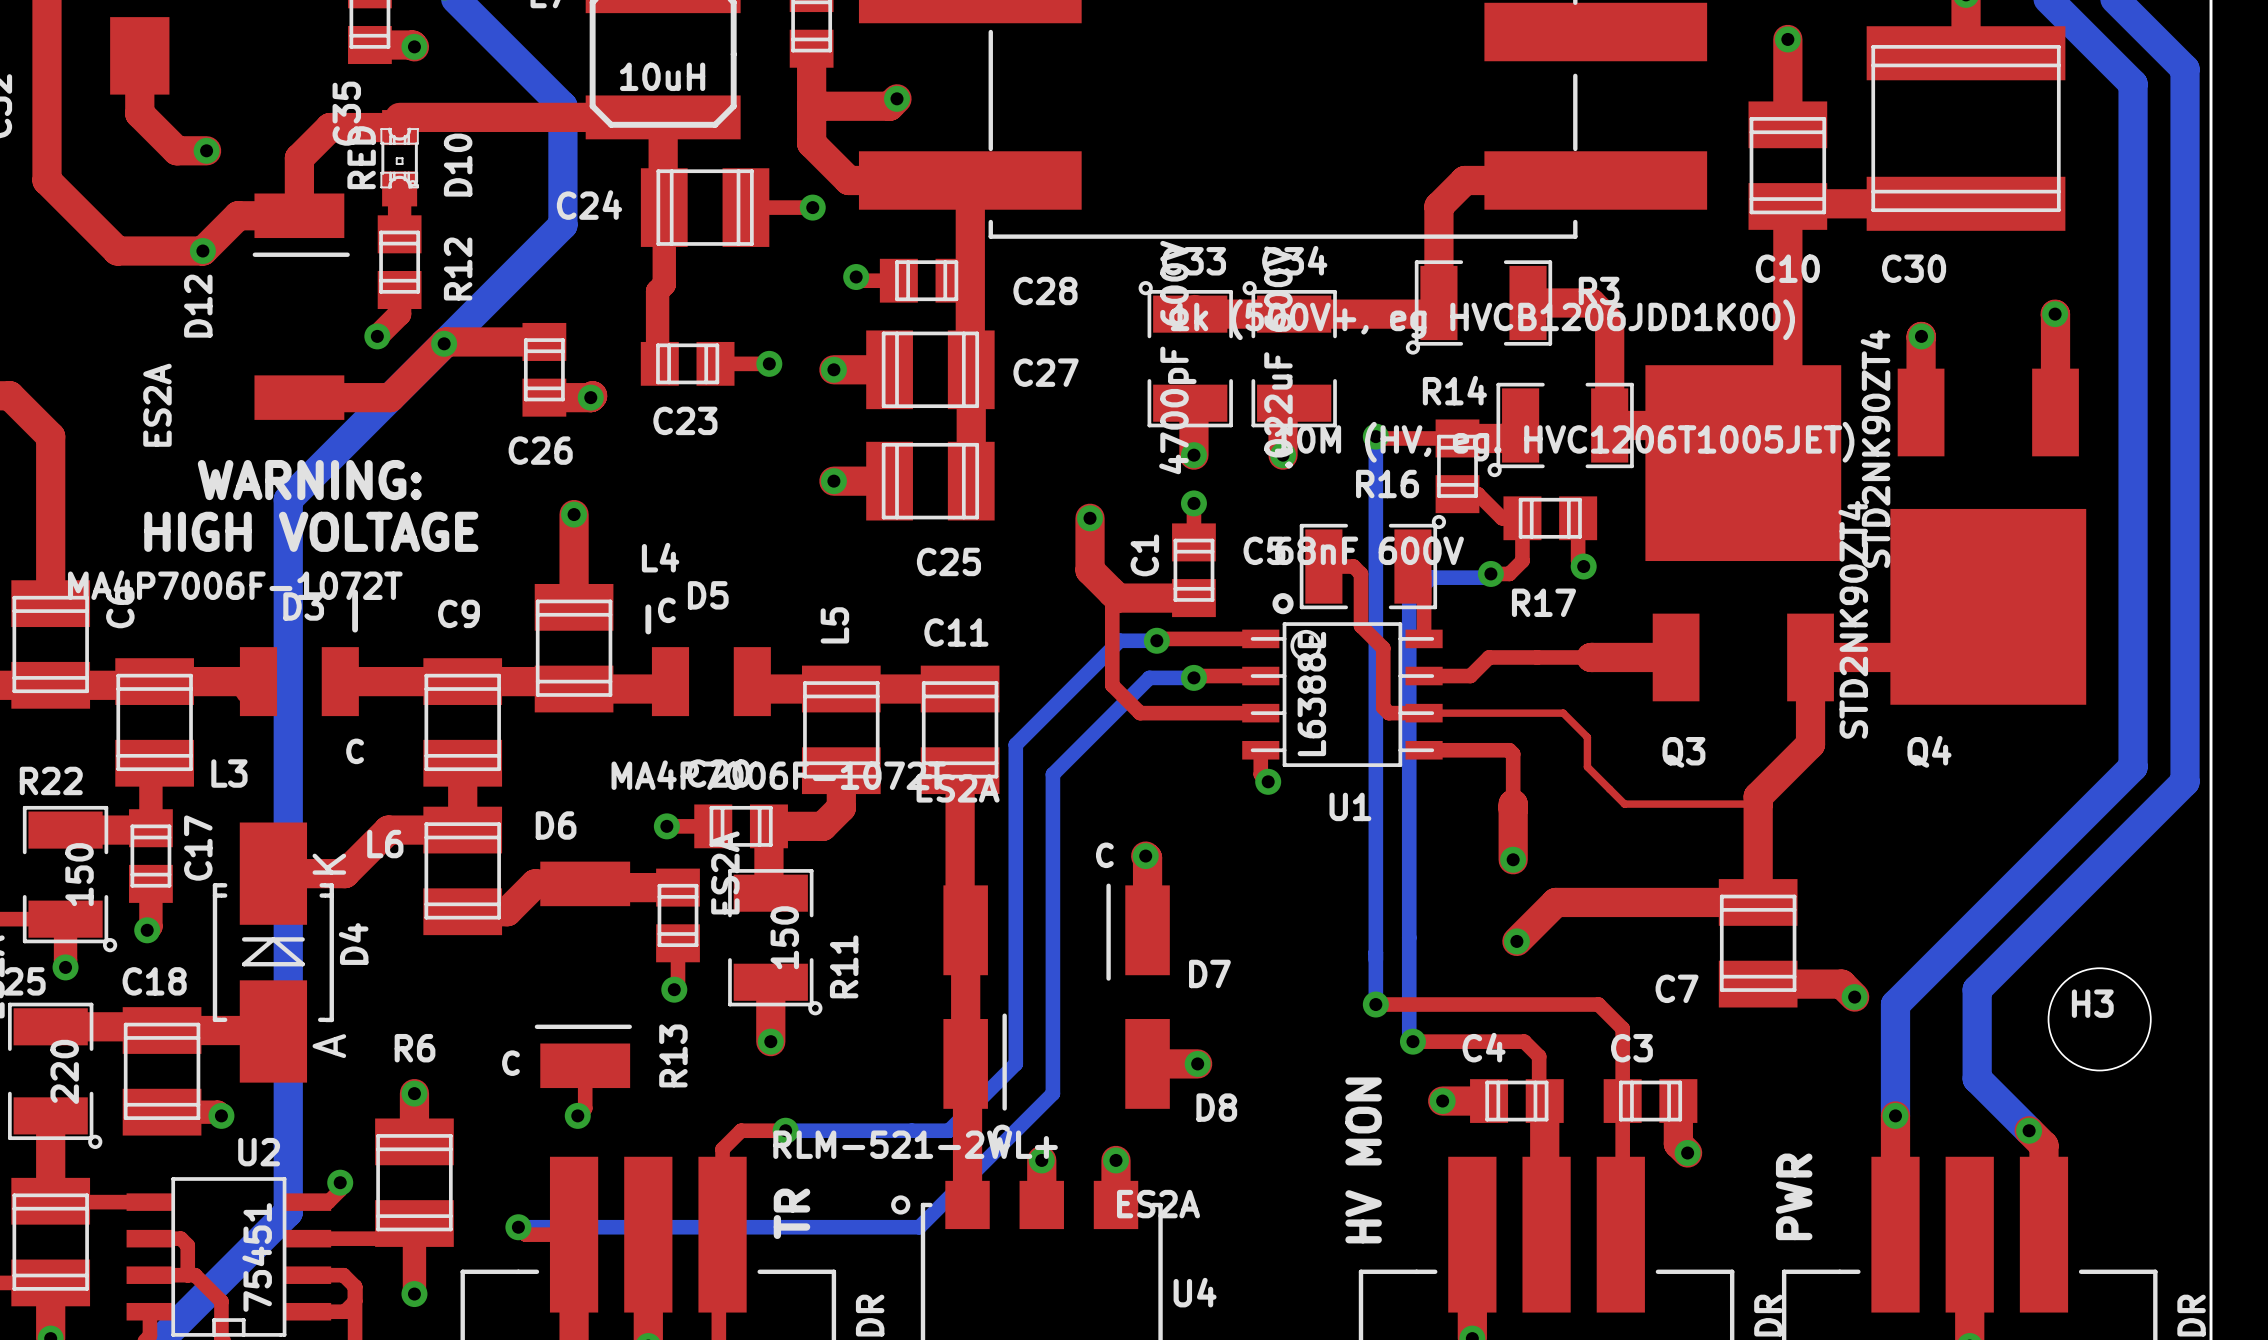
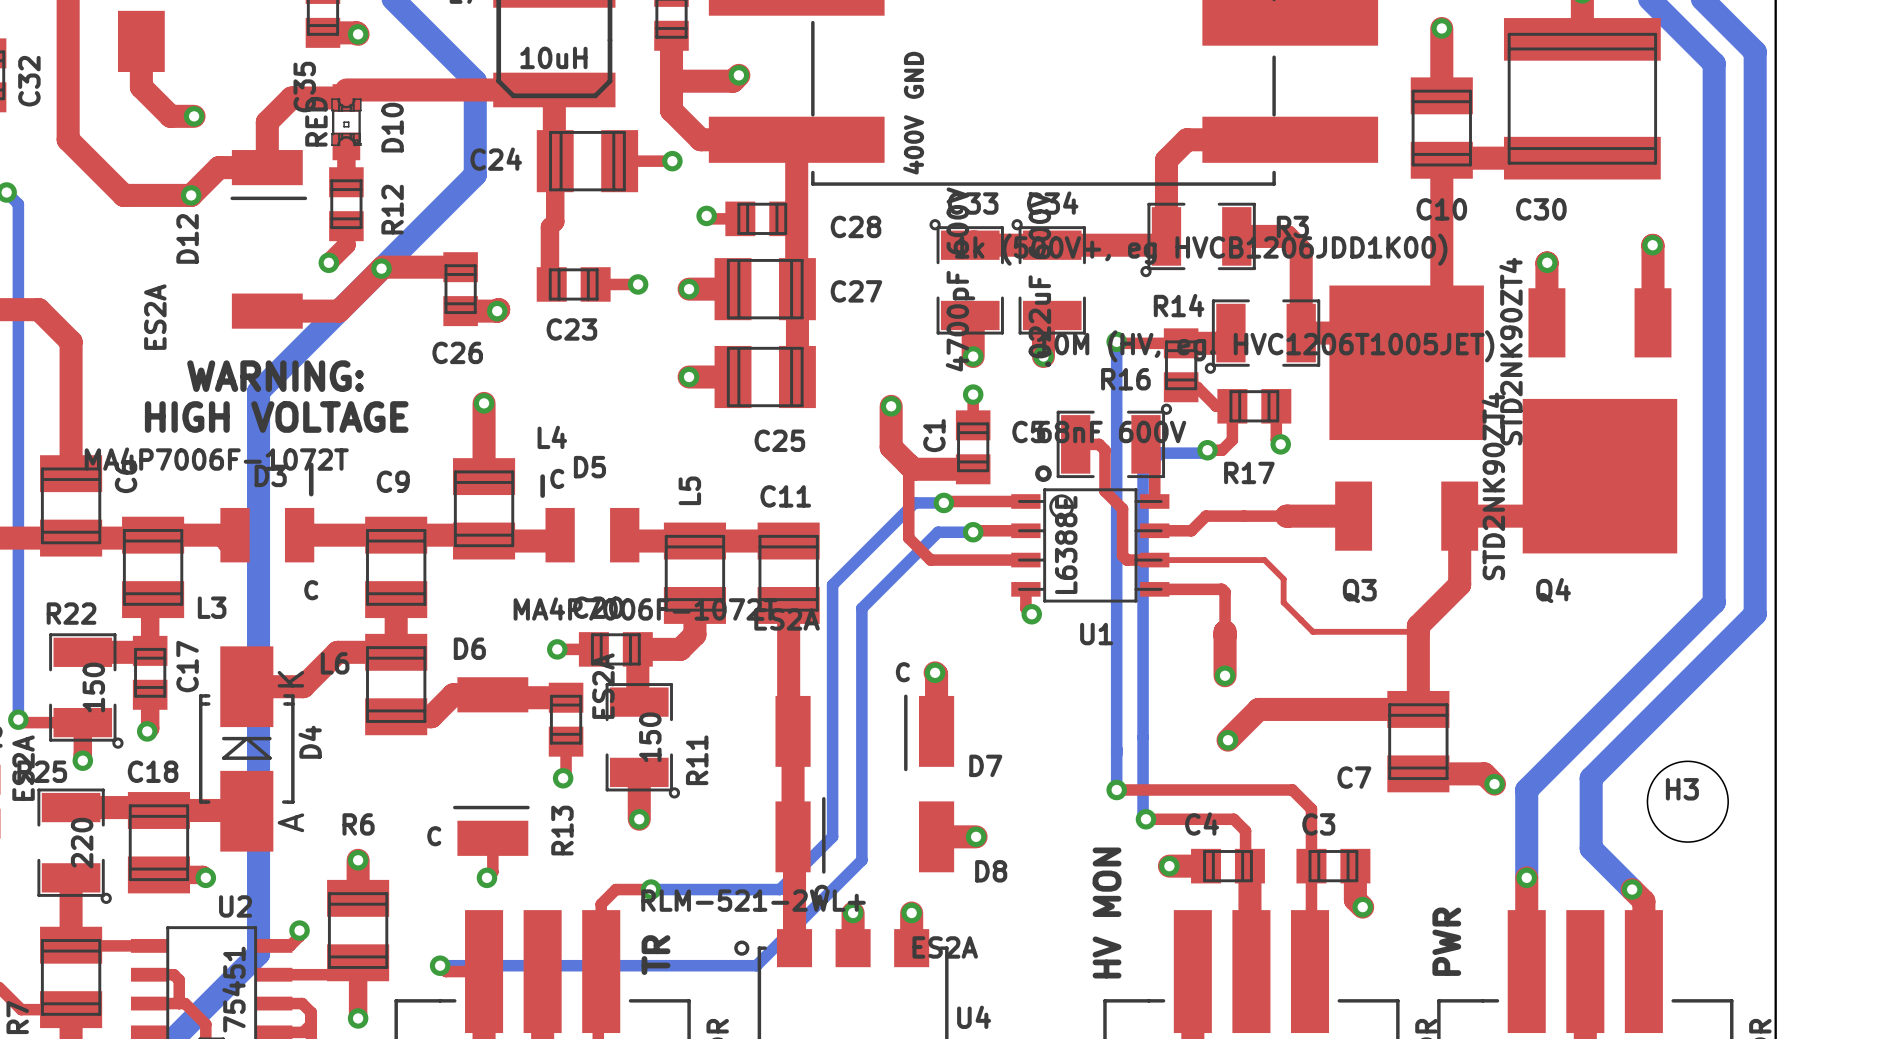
text: none -> GND (914, 75)
text: none -> 400V (913, 144)

